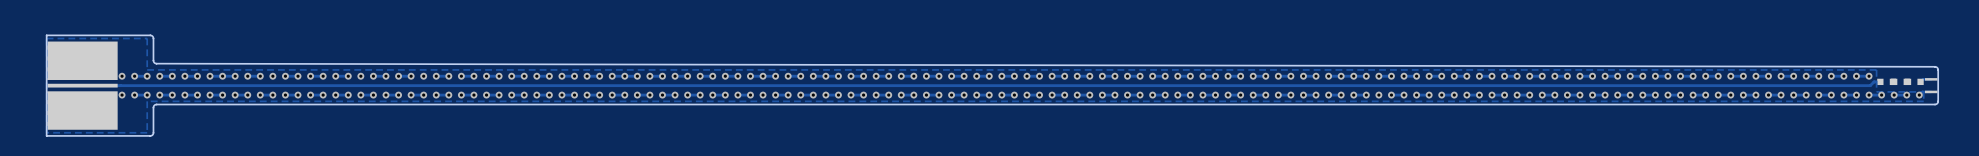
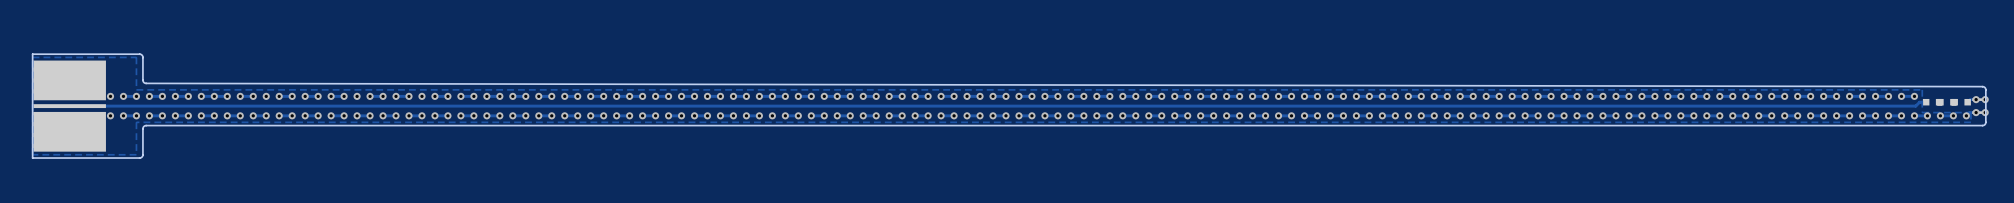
via: none -> (1976, 99)
via: none -> (1985, 99)
via: none -> (1976, 112)
via: none -> (1985, 112)

